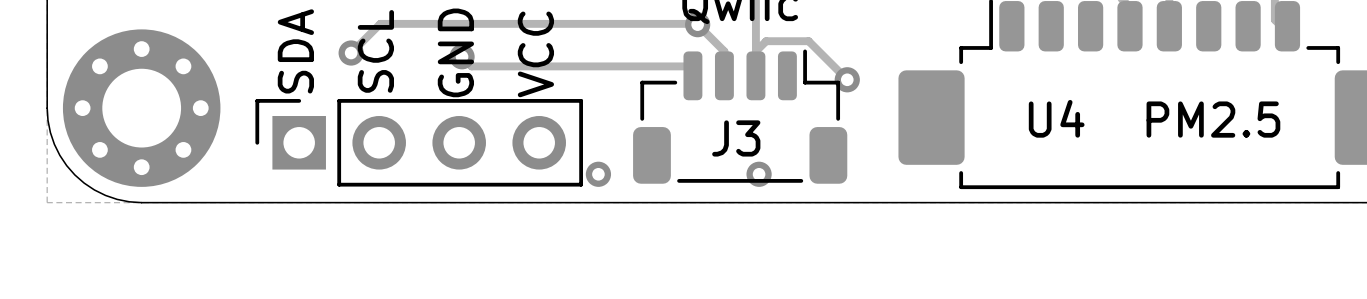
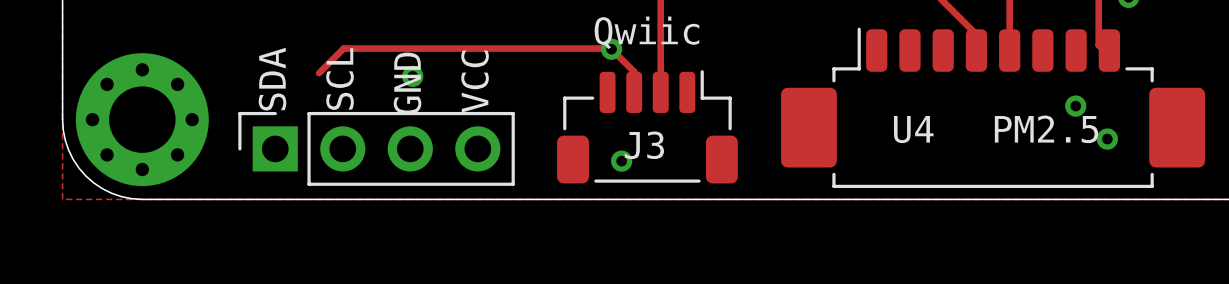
track: (755, 51) (766, 41) (808, 41) (847, 79) -> none
via: (351, 53) -> none
track: (462, 56) (471, 66) (692, 66) -> none
via: (847, 79) -> none
via: none -> (1075, 106)
via: none -> (1107, 139)
via: (598, 174) -> none
via position: (759, 174) -> (621, 161)

